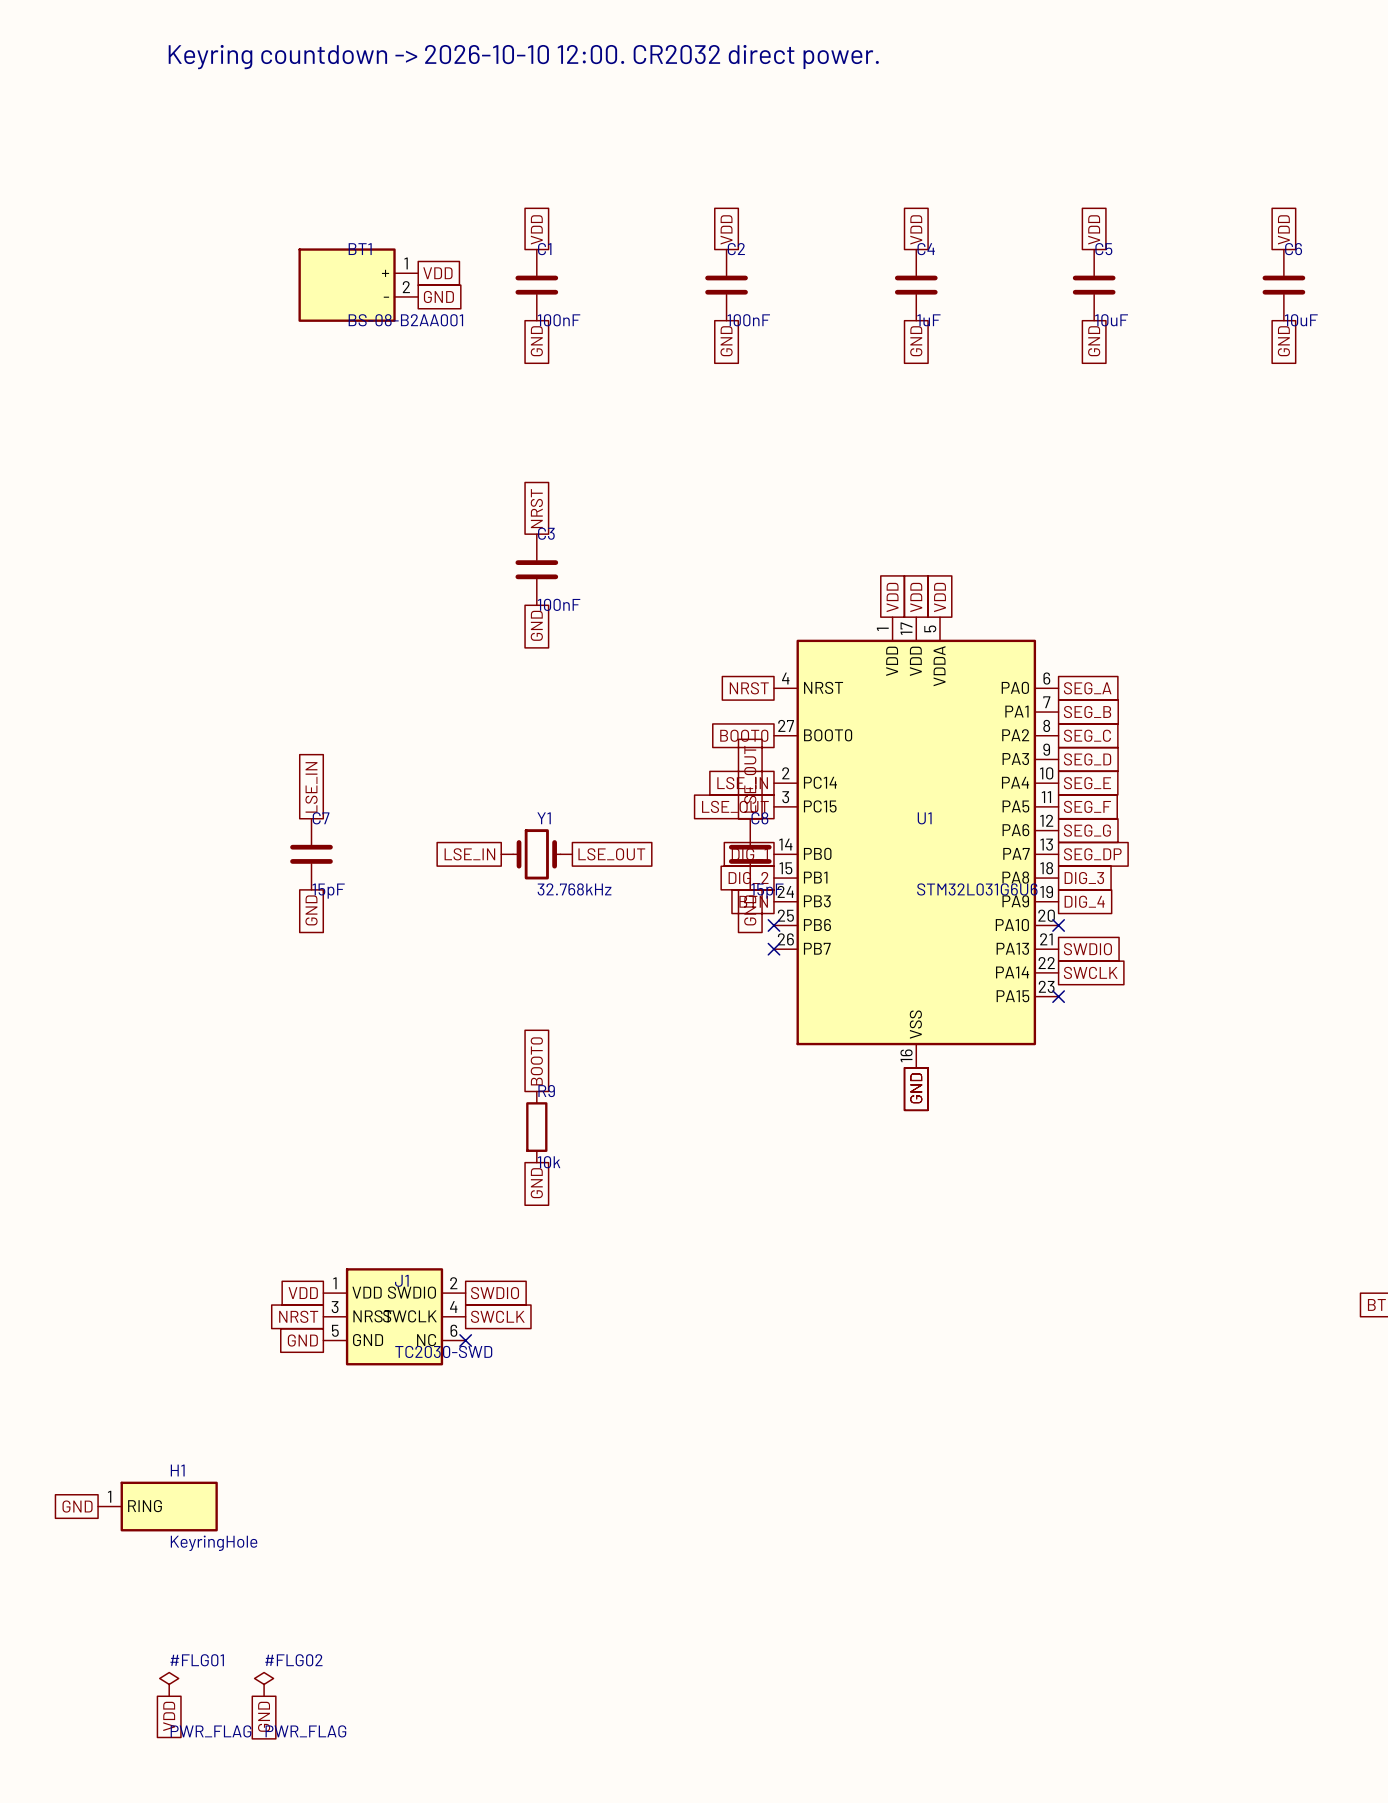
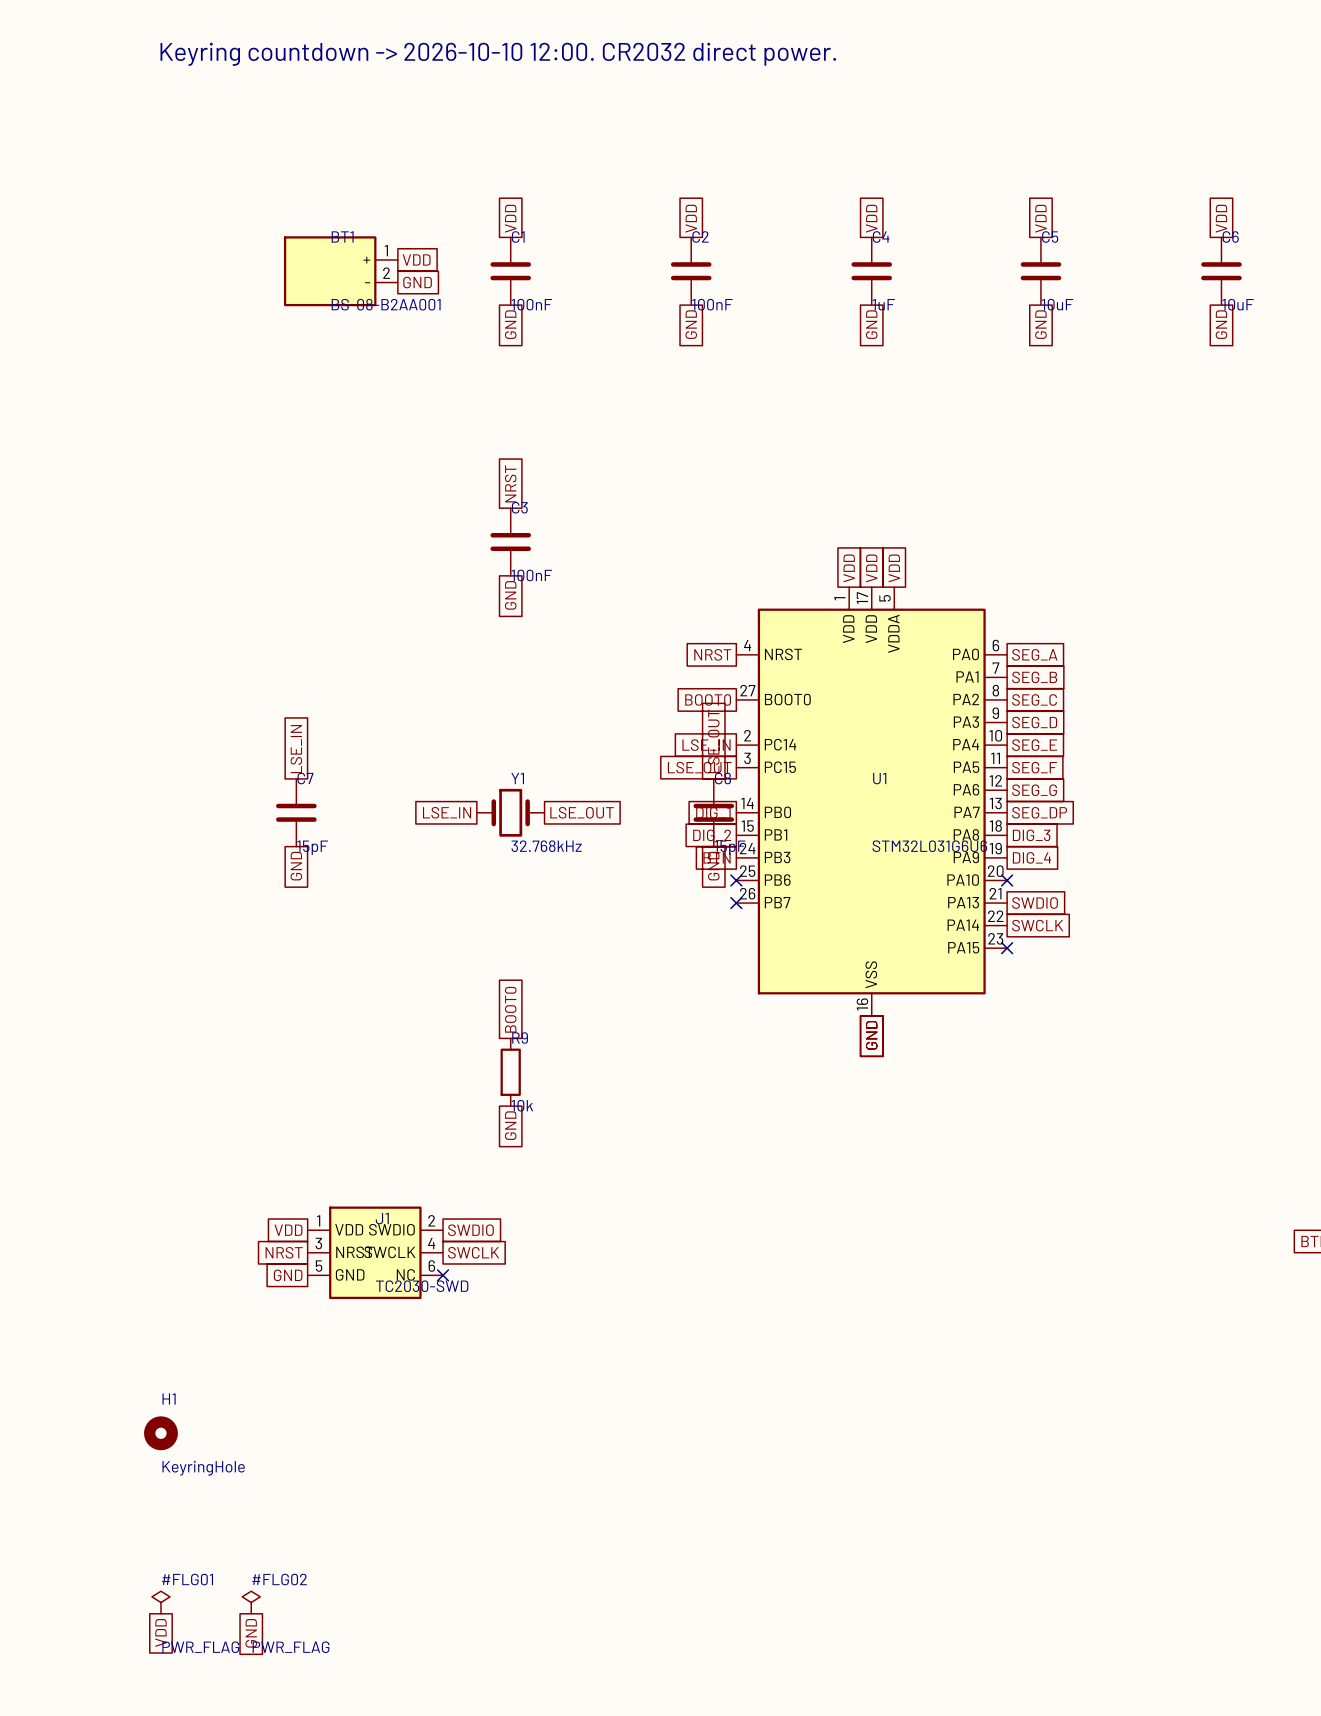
H1 symbol: [98, 1481, 218, 1532] -> [144, 1416, 178, 1451]
global label: GND (77, 1506) -> none

